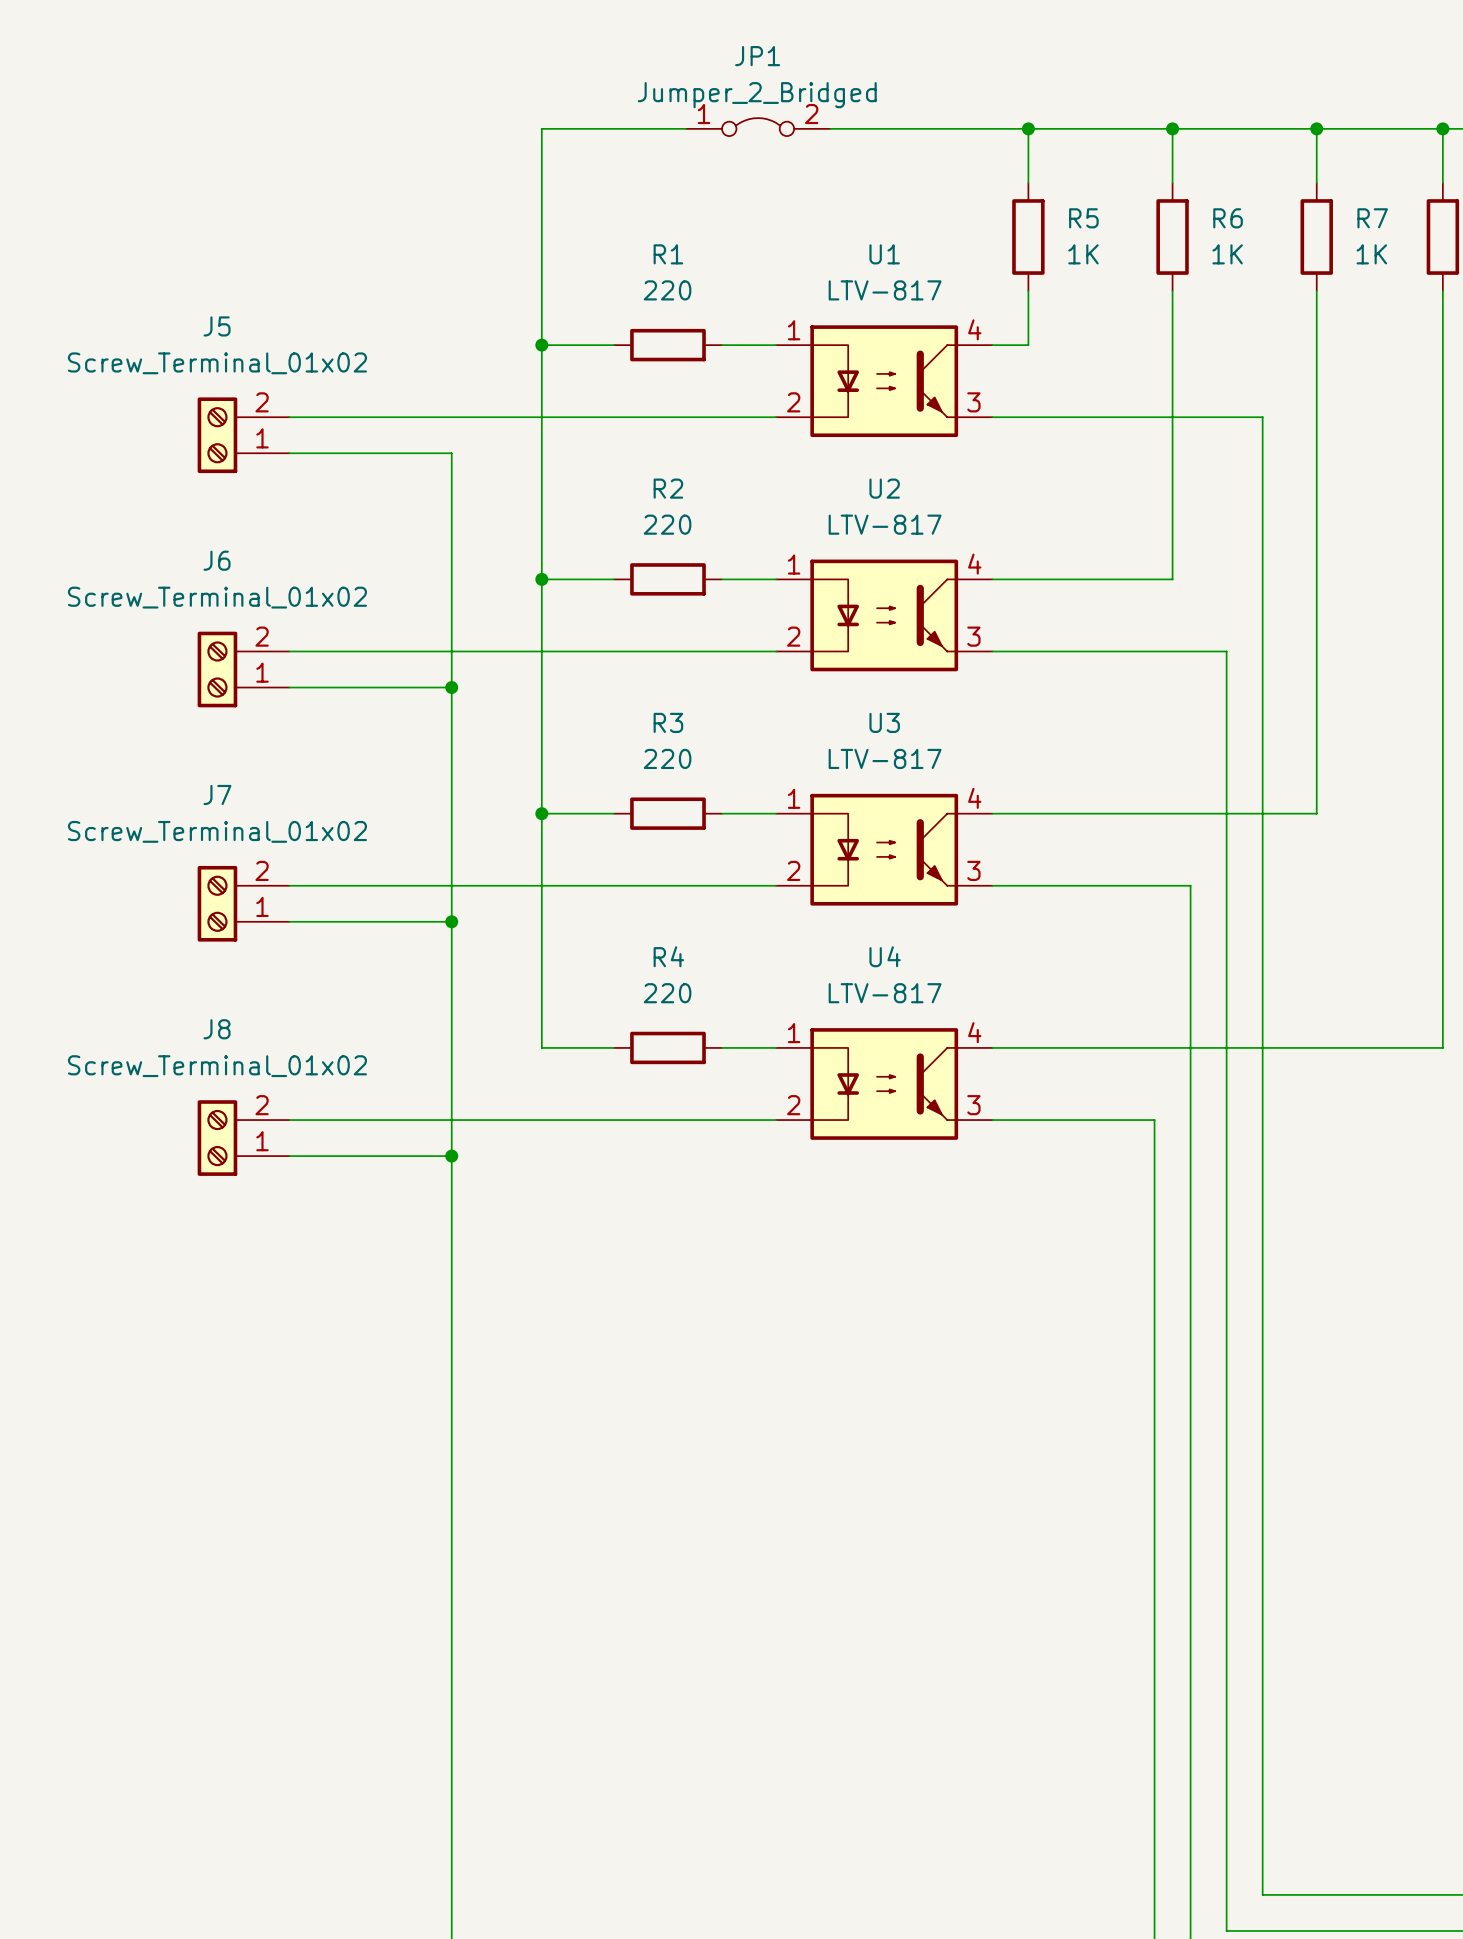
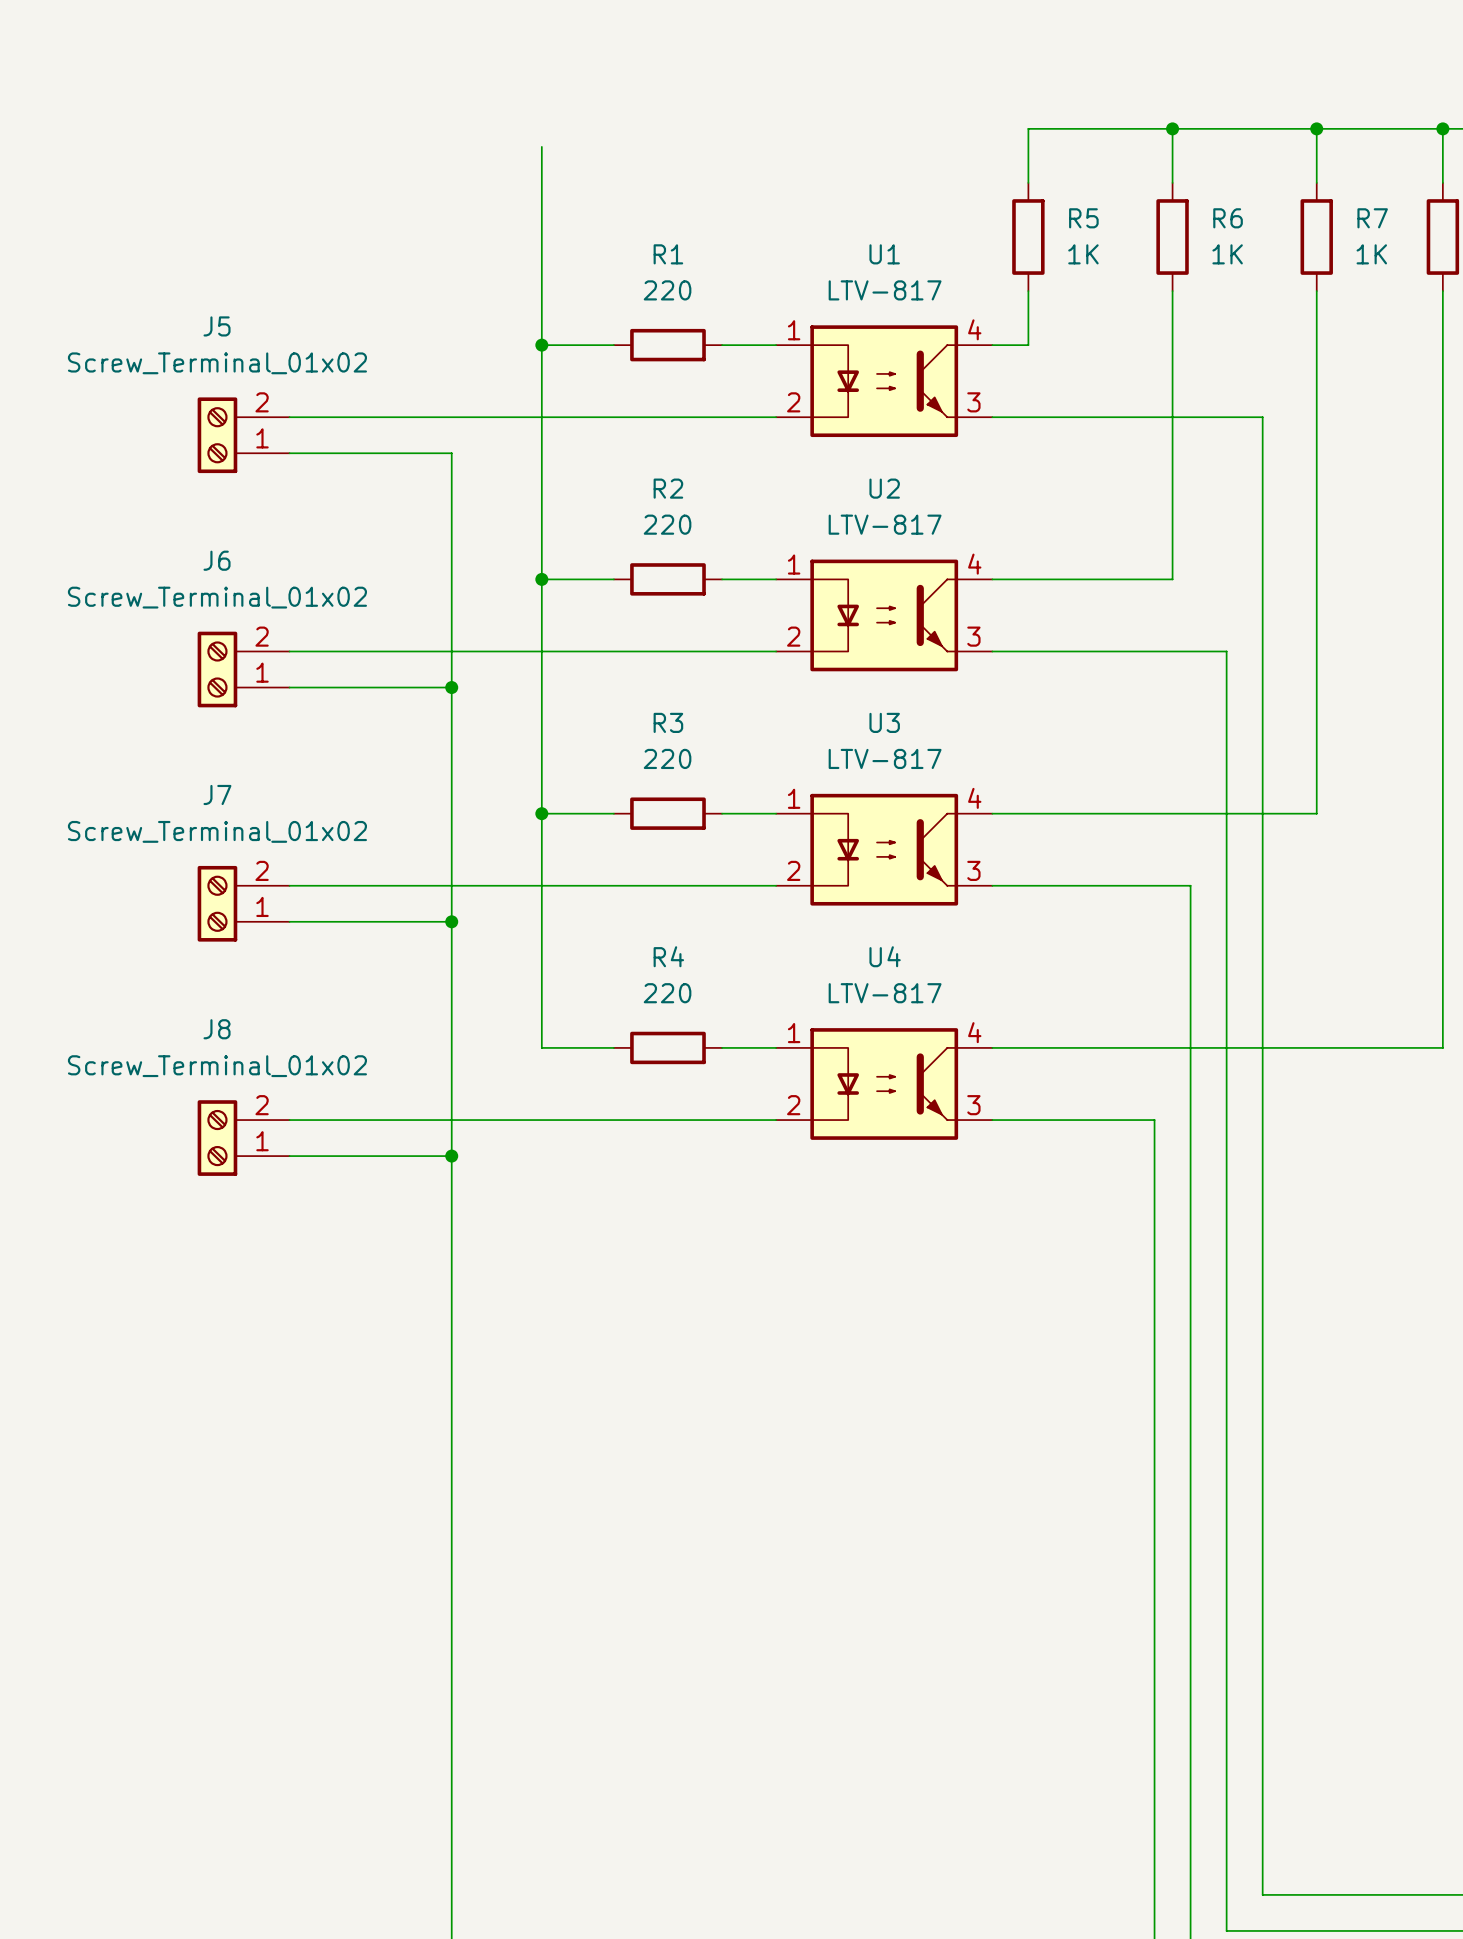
JP1: Jumper_2_Bridged (758, 127) -> none
wire: (686, 128) (541, 128) (541, 146) -> none
wire: (830, 128) (1028, 128) -> none
junction: (1028, 128) -> none

